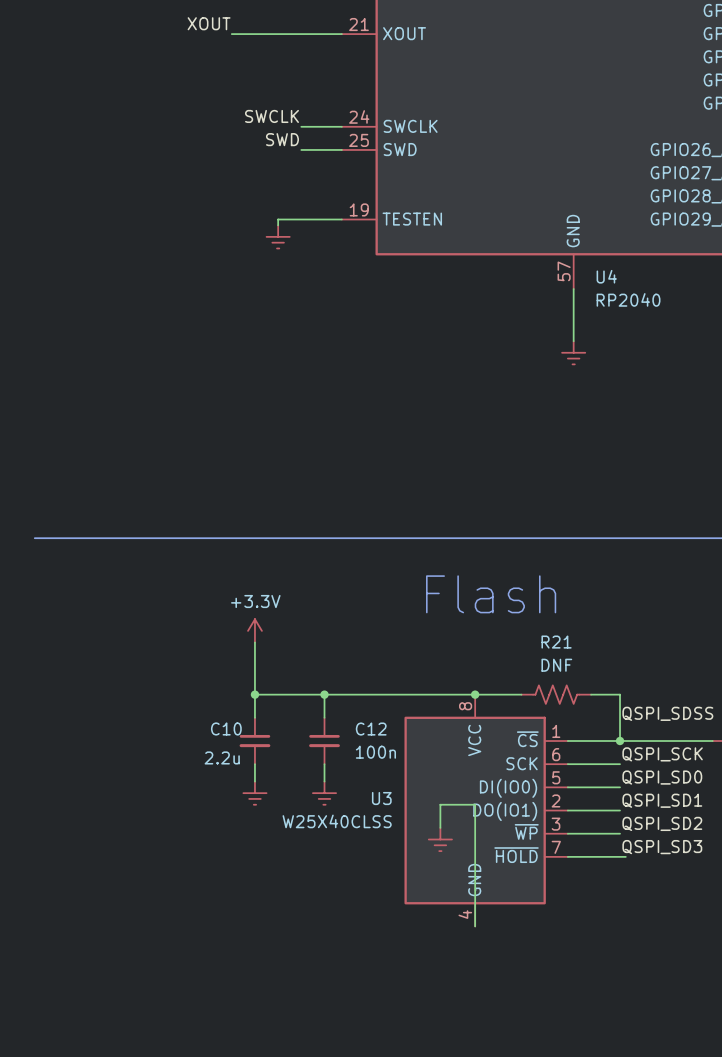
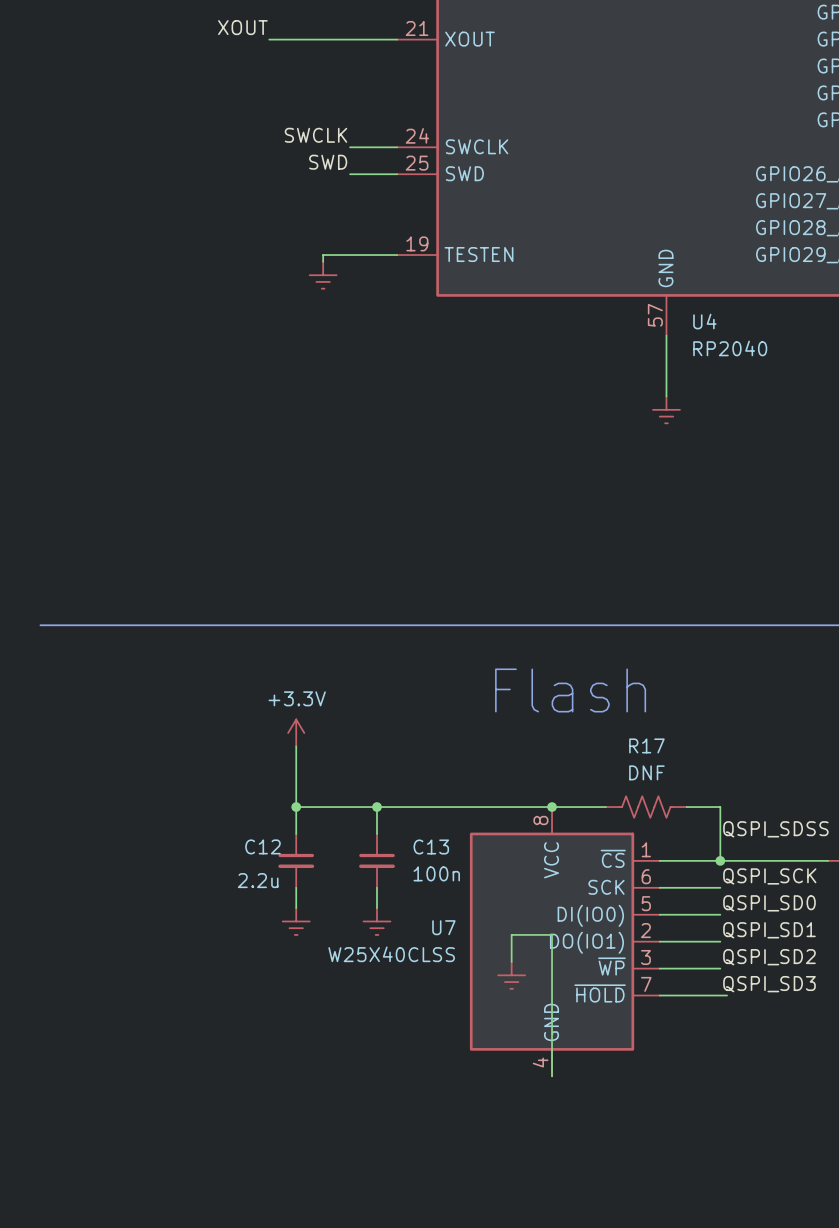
R21 name: R21 (556, 642) -> R17 (646, 745)
C10 name: C10 (226, 728) -> C12 (262, 846)
C12 name: C12 (371, 729) -> C13 (431, 846)
U3 name: U3 (381, 798) -> U7 (443, 927)

